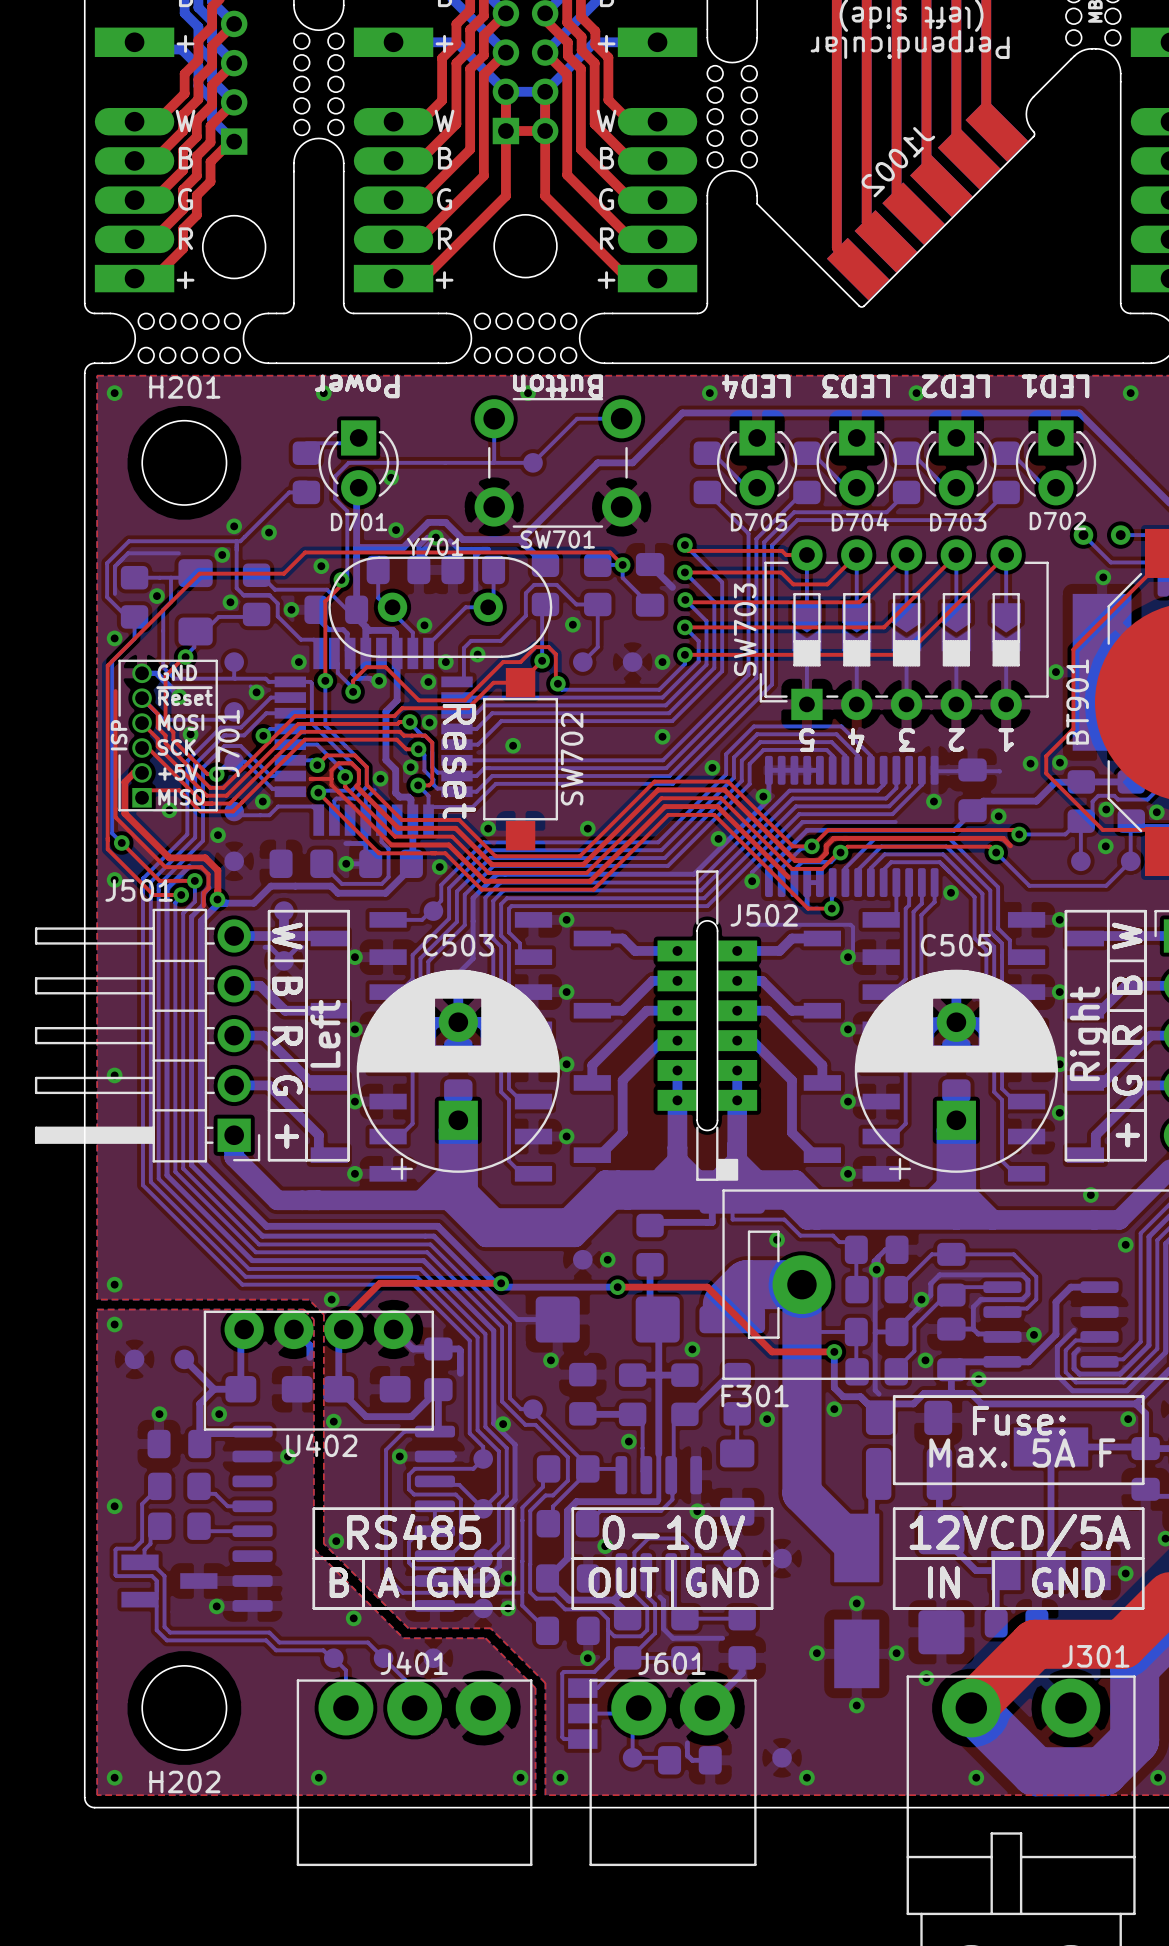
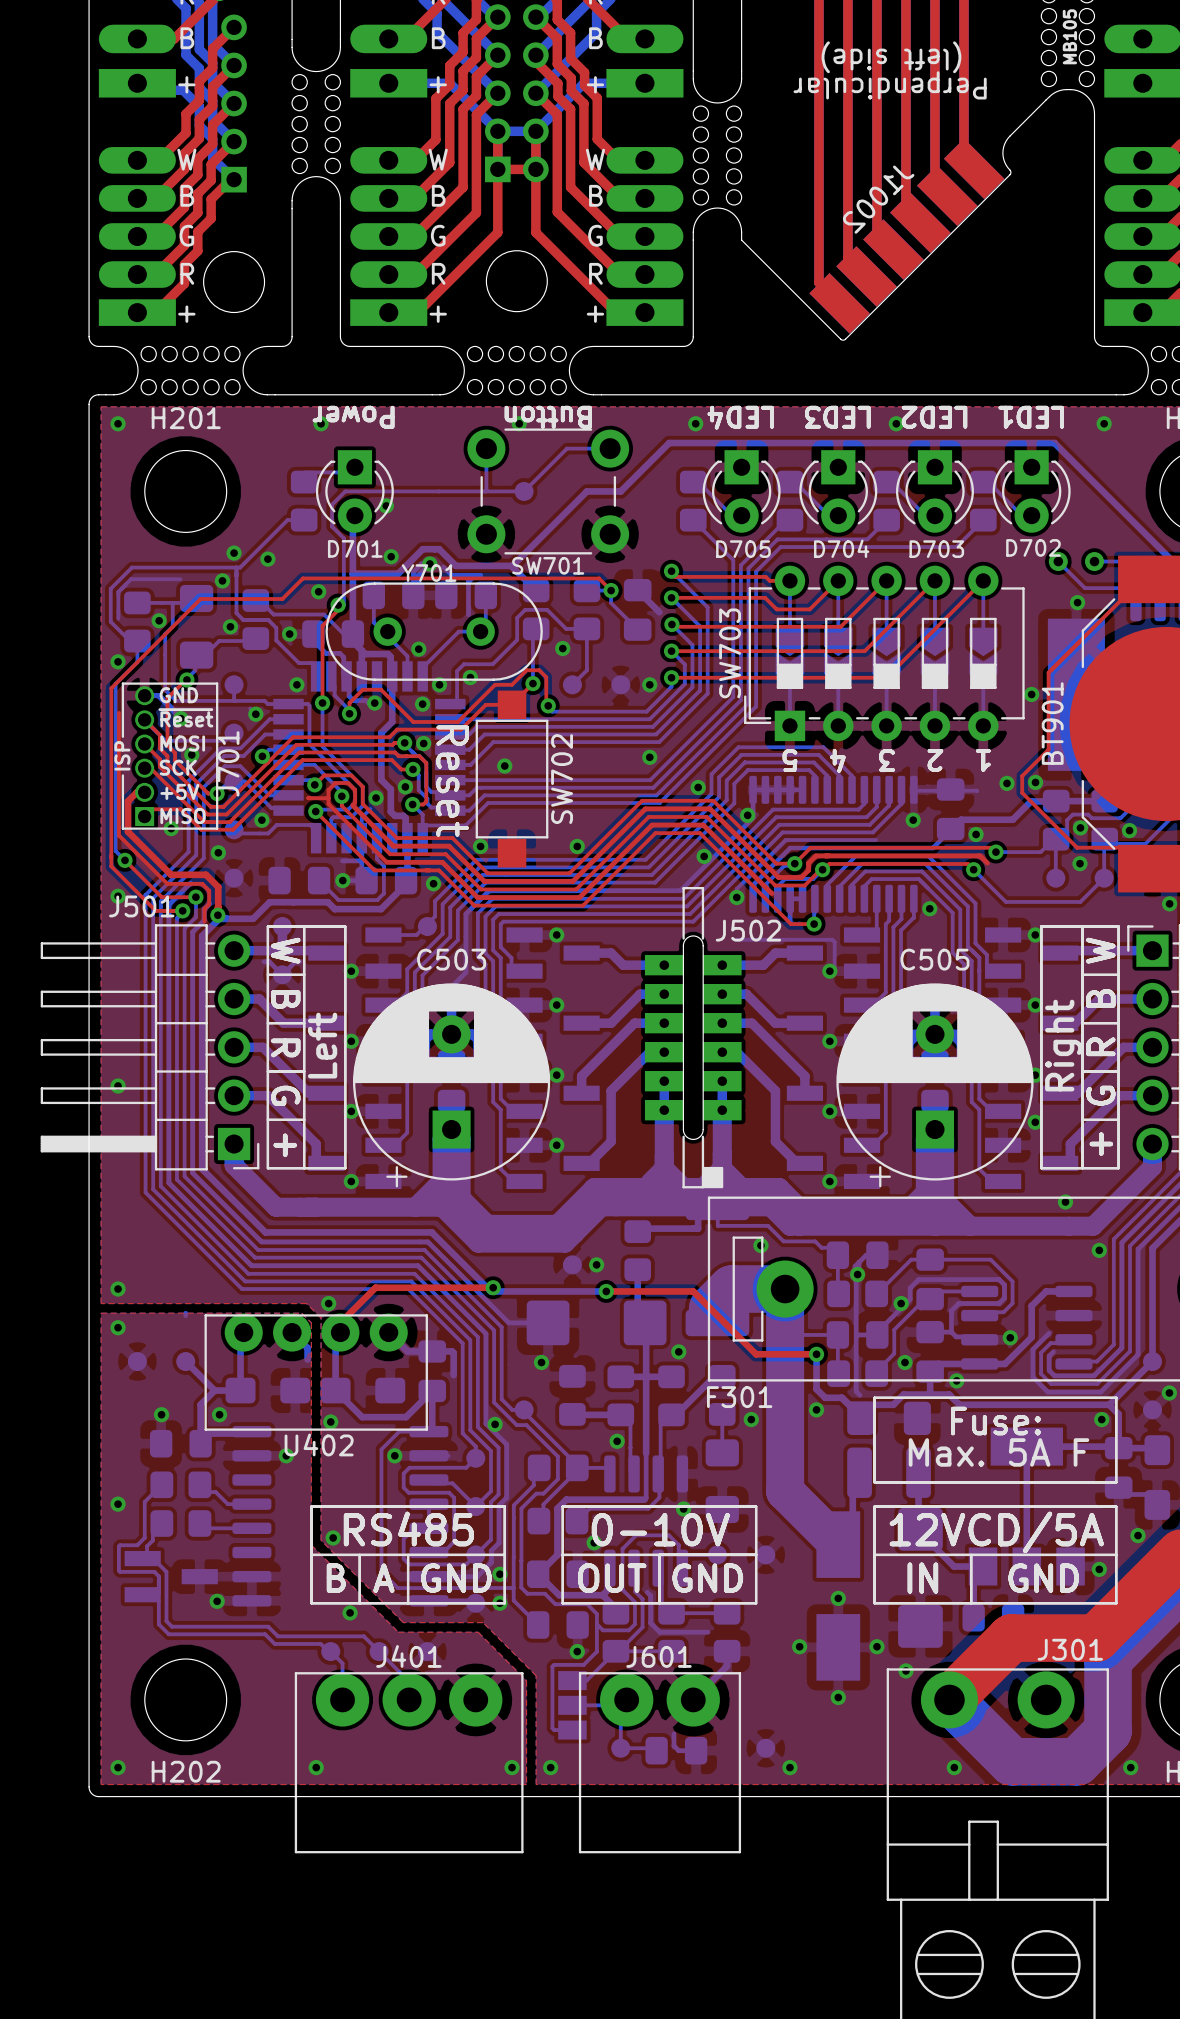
bottom track: none -> (185, 1313) (185, 1315)

